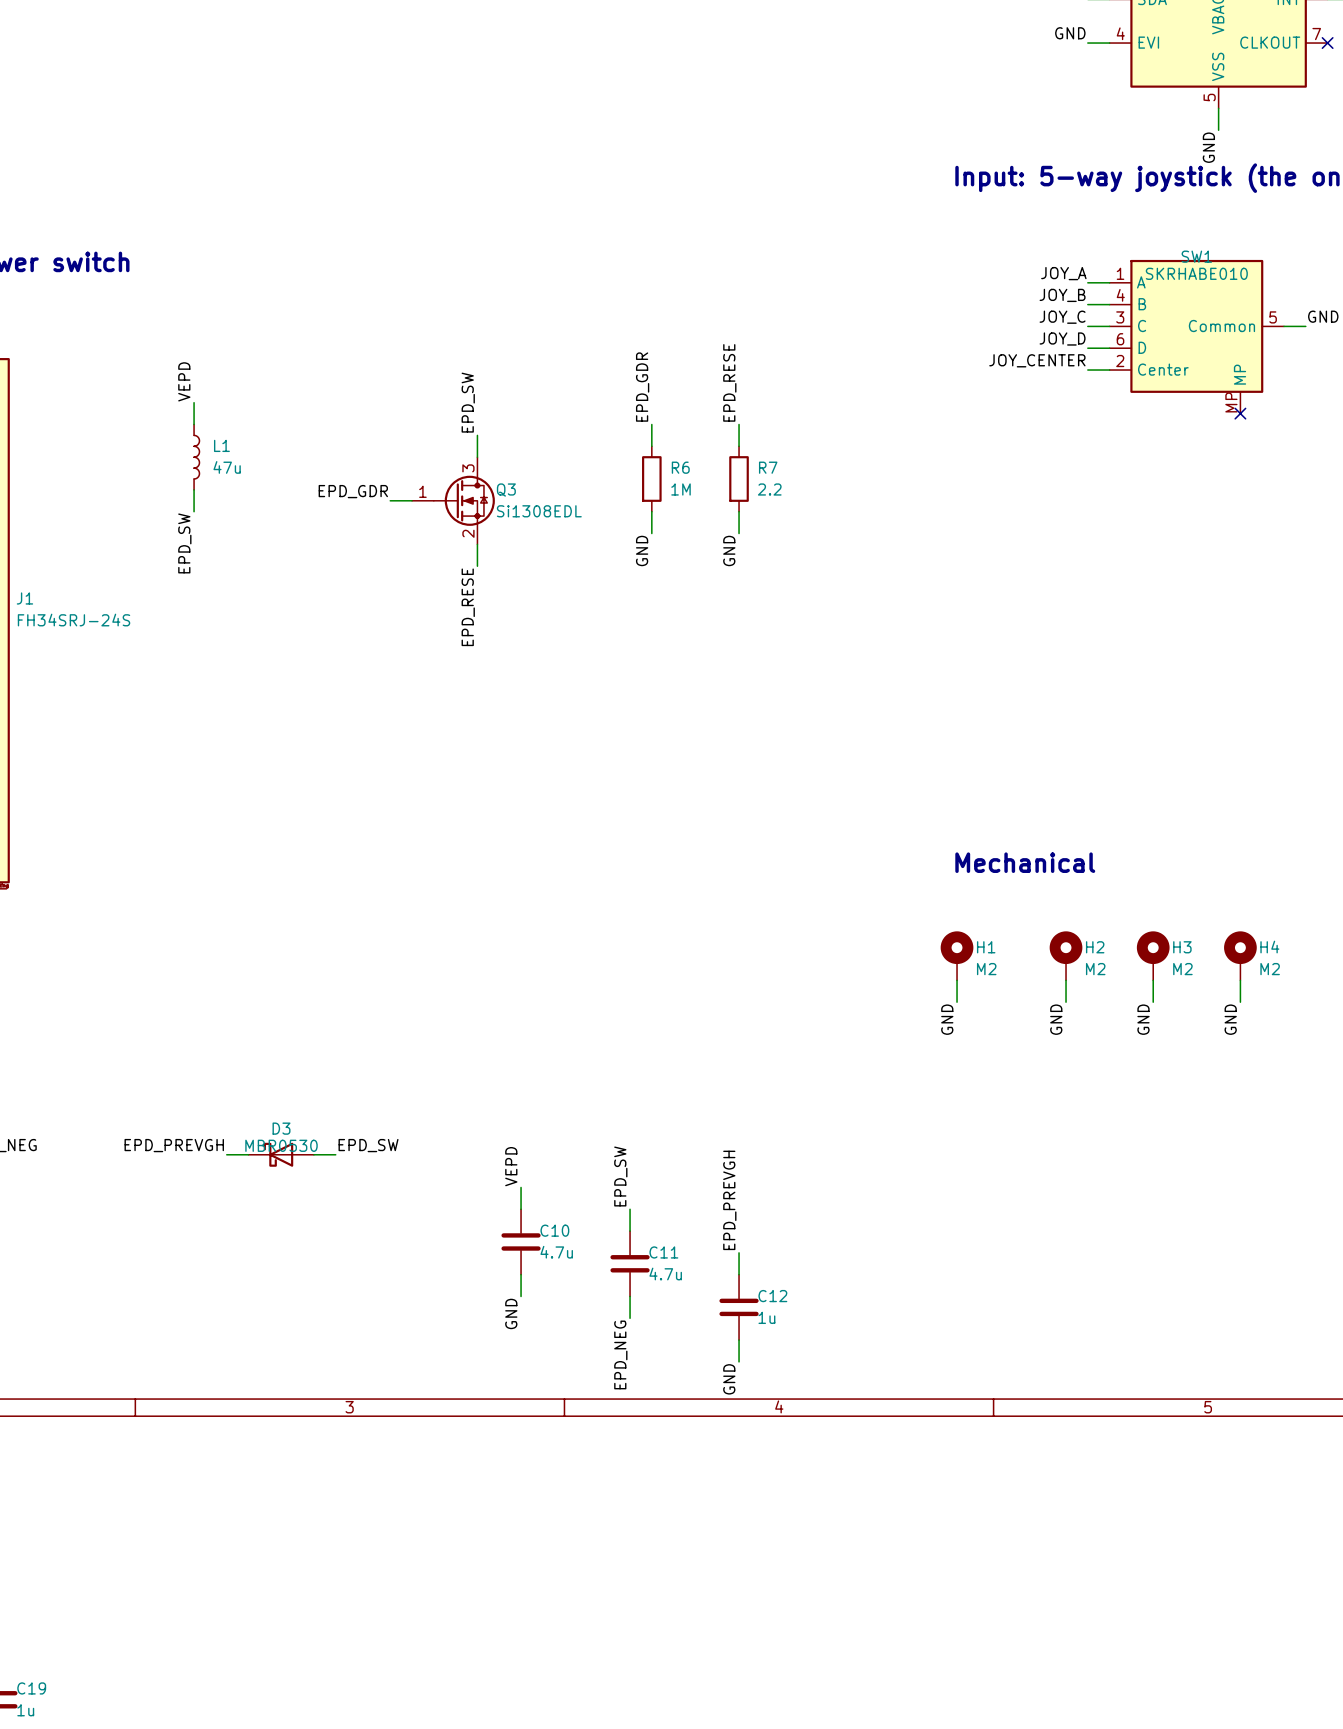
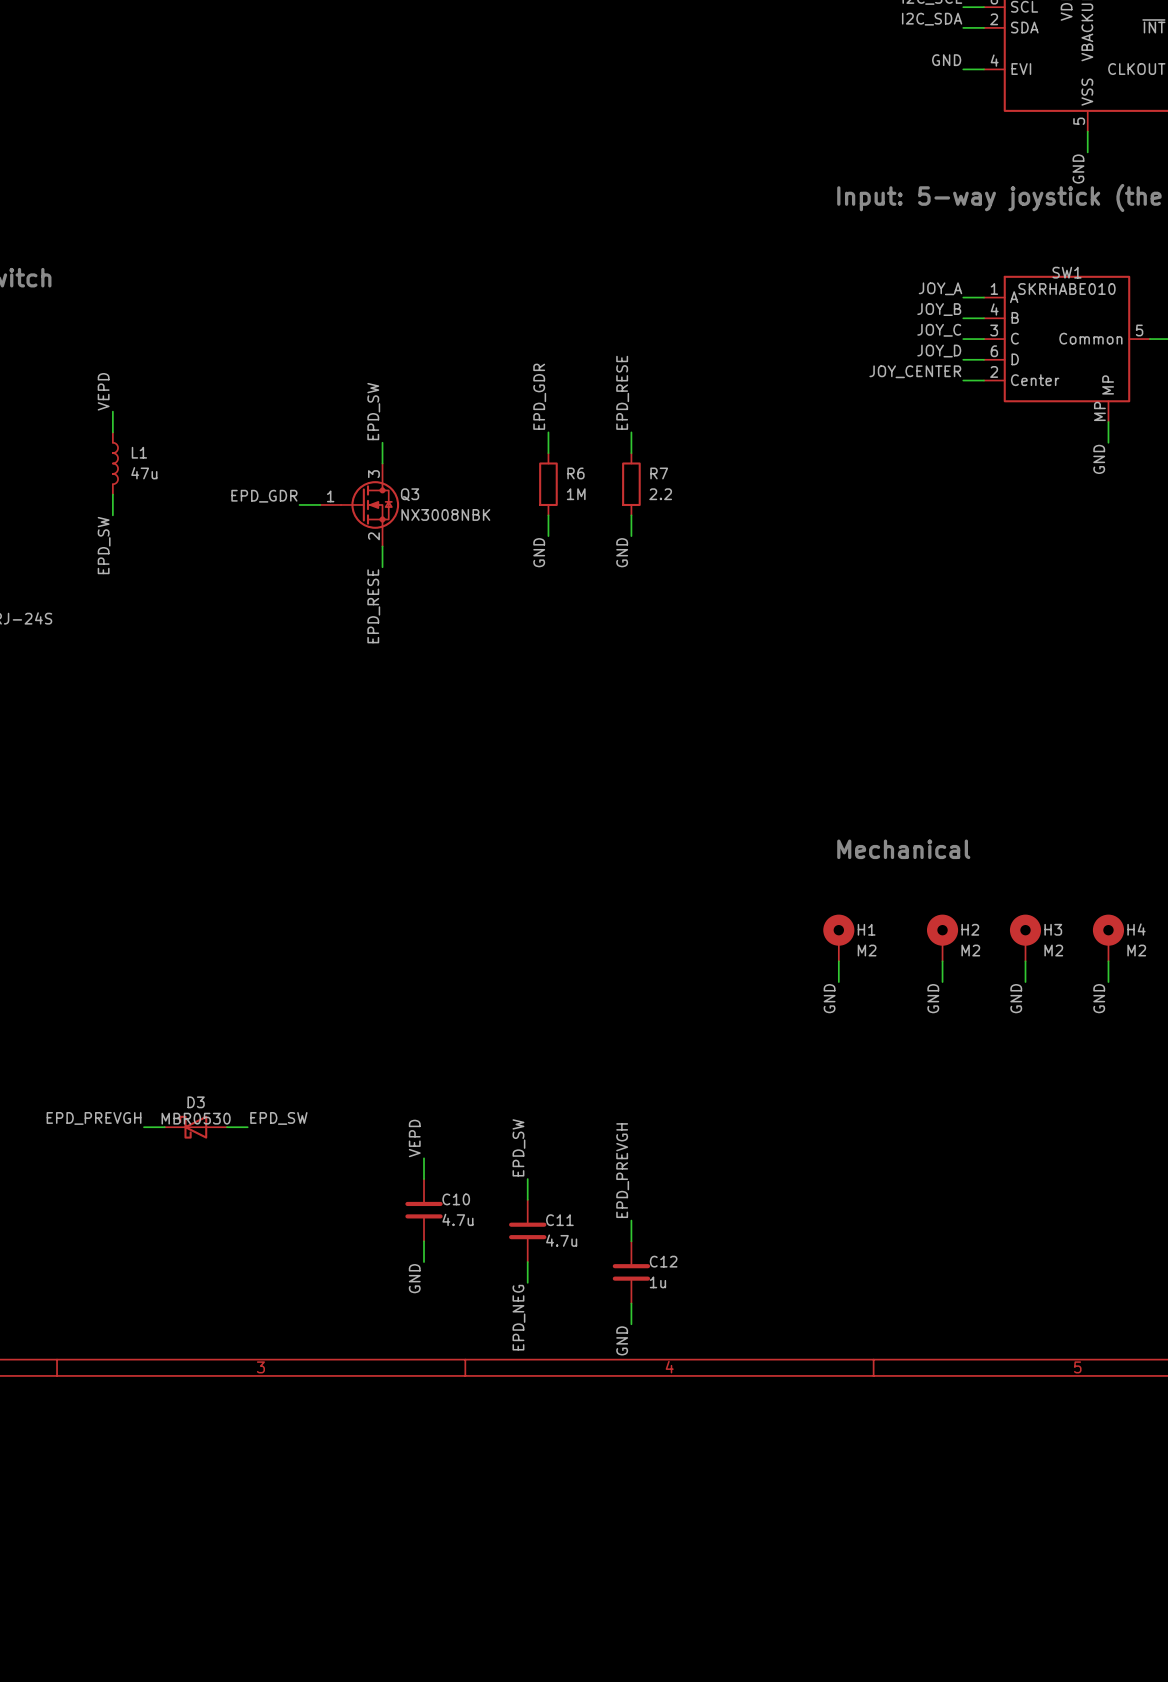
wire: none -> (1108, 422) (1108, 442)
no-connect mark: (1240, 413) -> none
label: none -> GND (1099, 459)
Q3 value: Si1308EDL (539, 511) -> NX3008NBK (445, 514)

